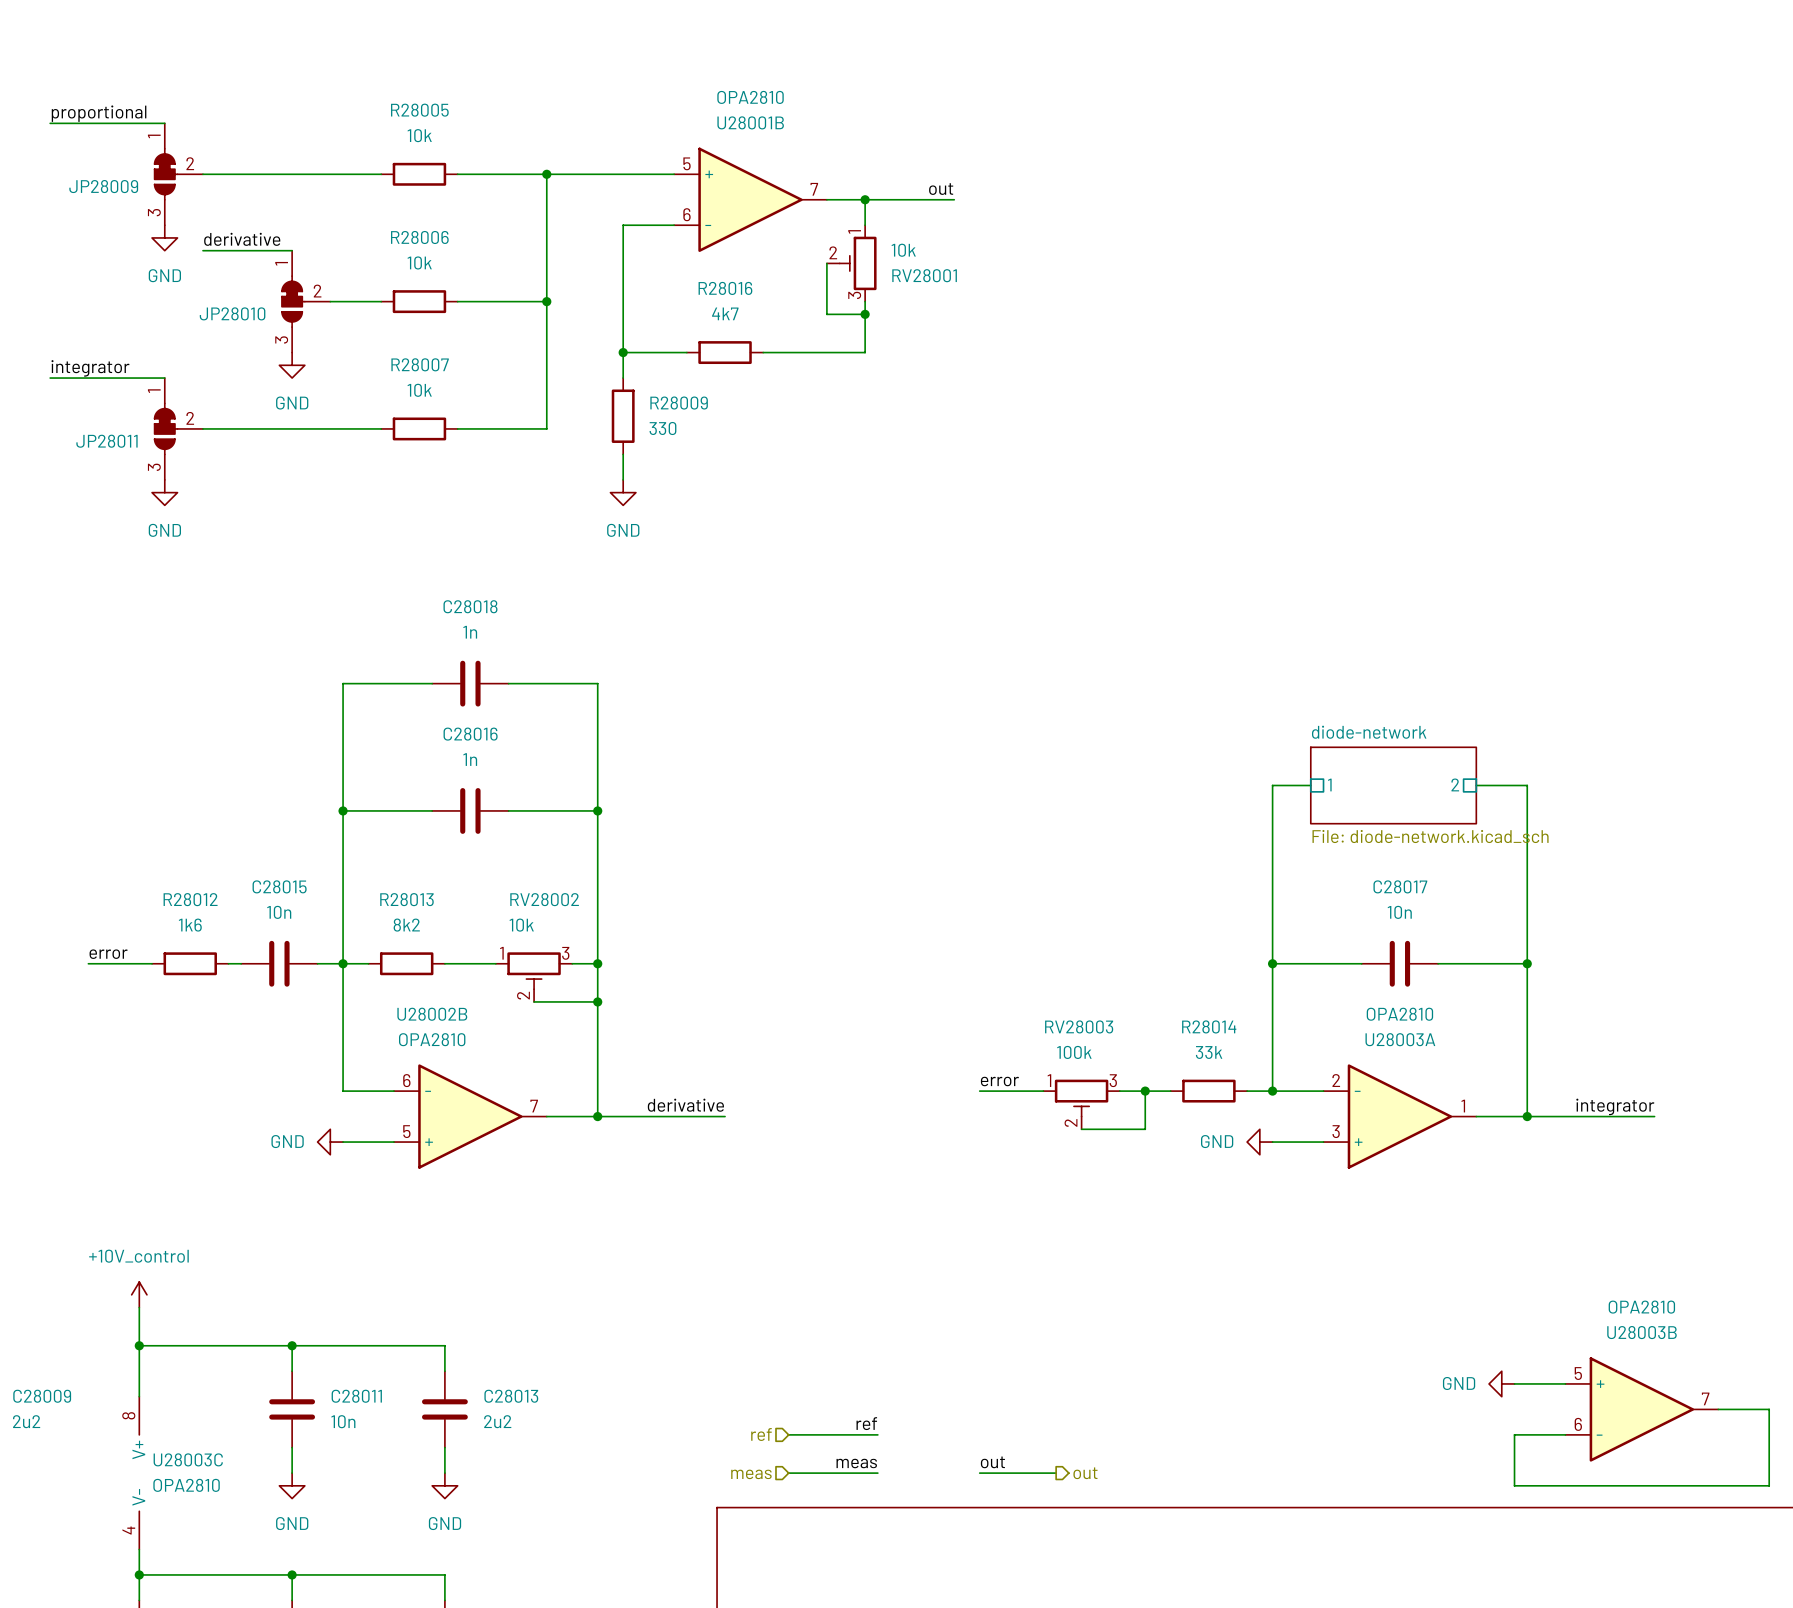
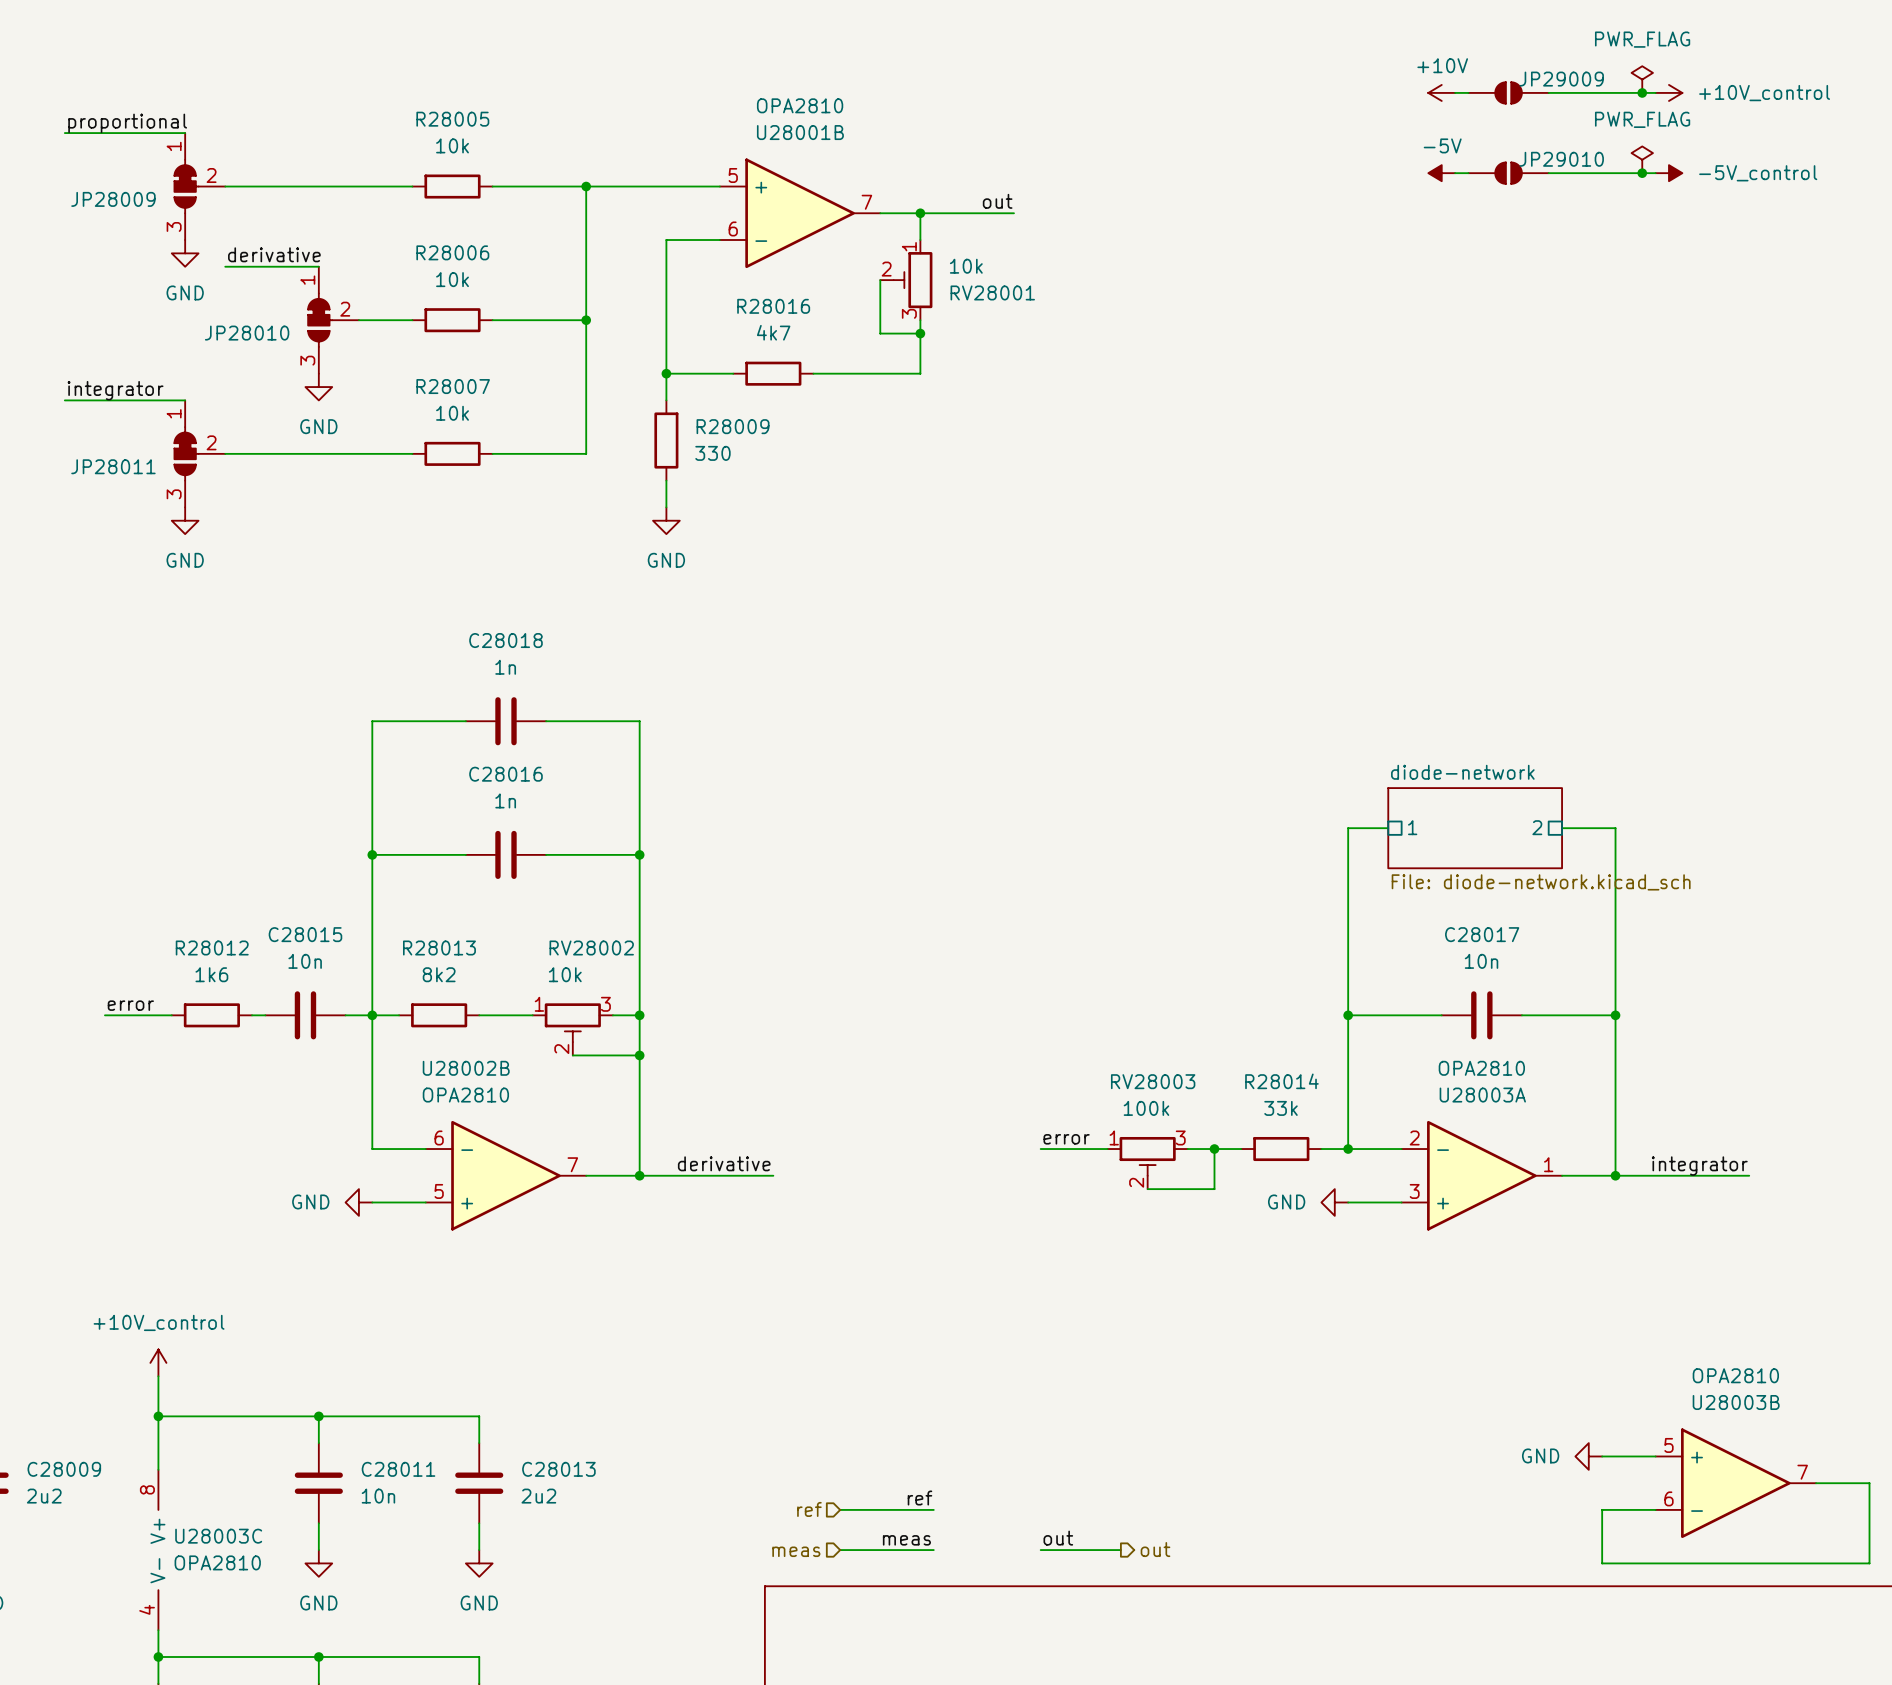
power symbol: none -> PWR_FLAG (1642, 79)
power symbol: none -> +10V (1441, 92)
wire: none -> (1455, 92) (1468, 92)
JP29009: none -> (1508, 92)
wire: none -> (1548, 92) (1655, 92)
junction: none -> (1642, 92)
power symbol: none -> +10V_control (1668, 92)
power symbol: none -> PWR_FLAG (1642, 159)
power symbol: none -> -5V (1441, 173)
wire: none -> (1455, 173) (1468, 173)
JP29010: none -> (1508, 173)
wire: none -> (1548, 173) (1655, 173)
junction: none -> (1642, 173)
power symbol: none -> -5V_control (1668, 173)

